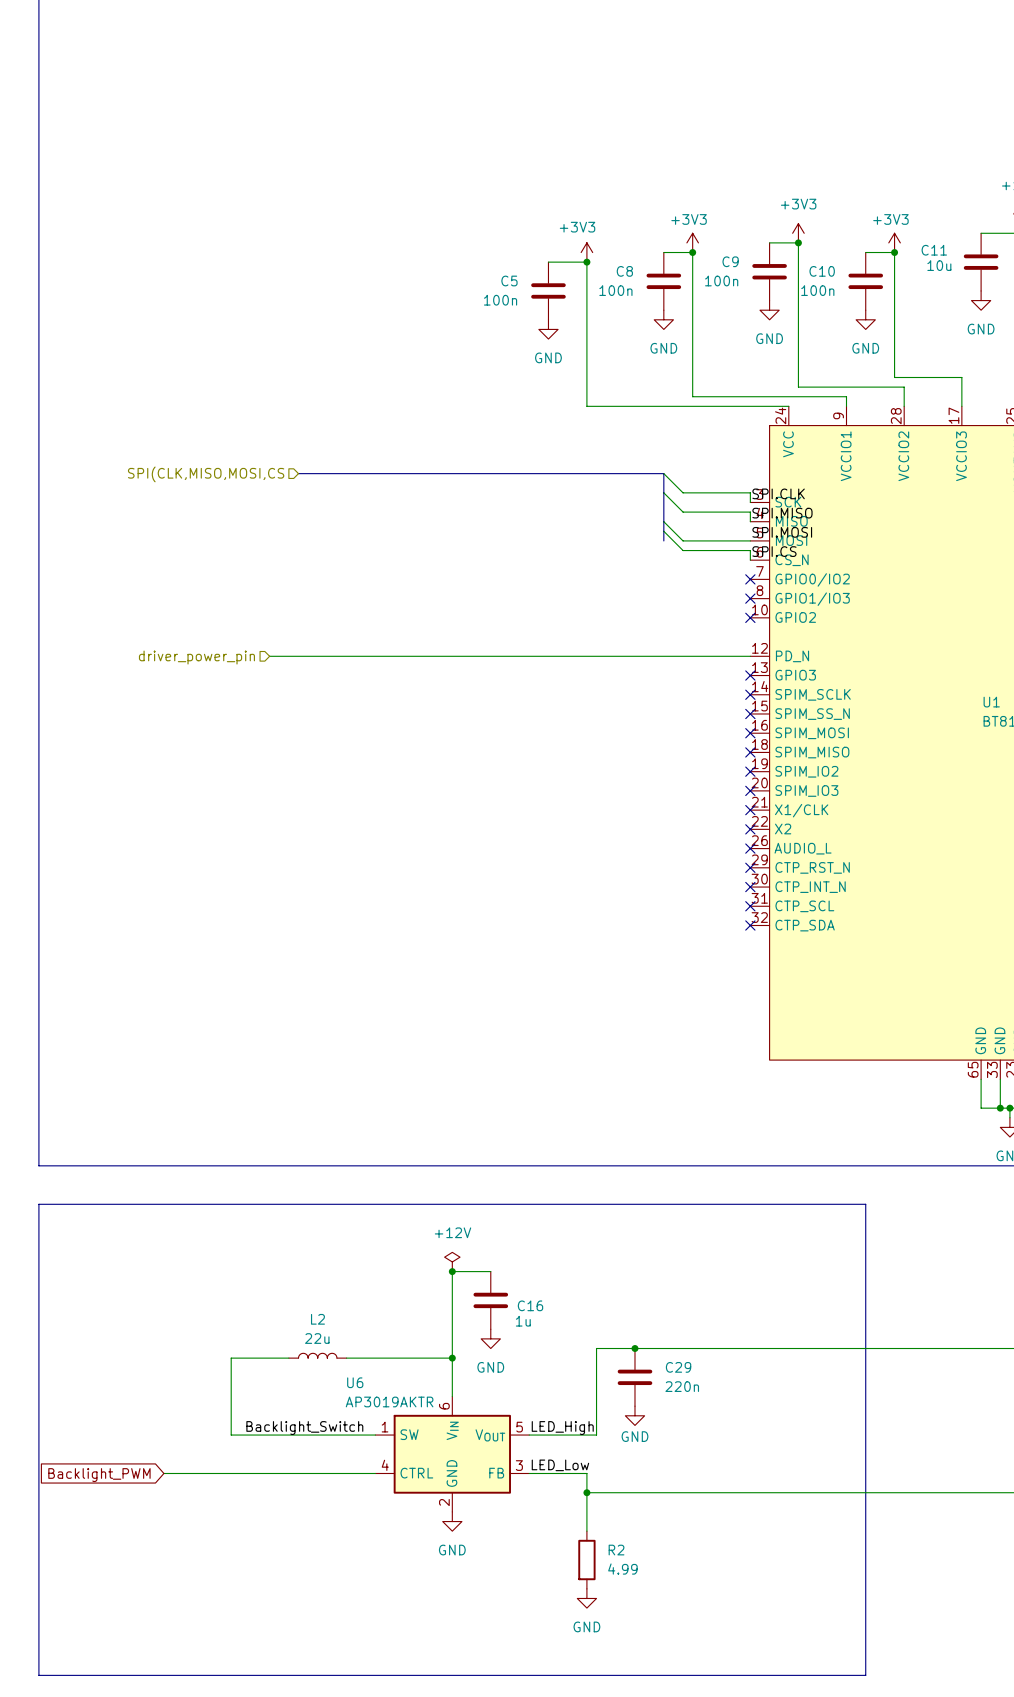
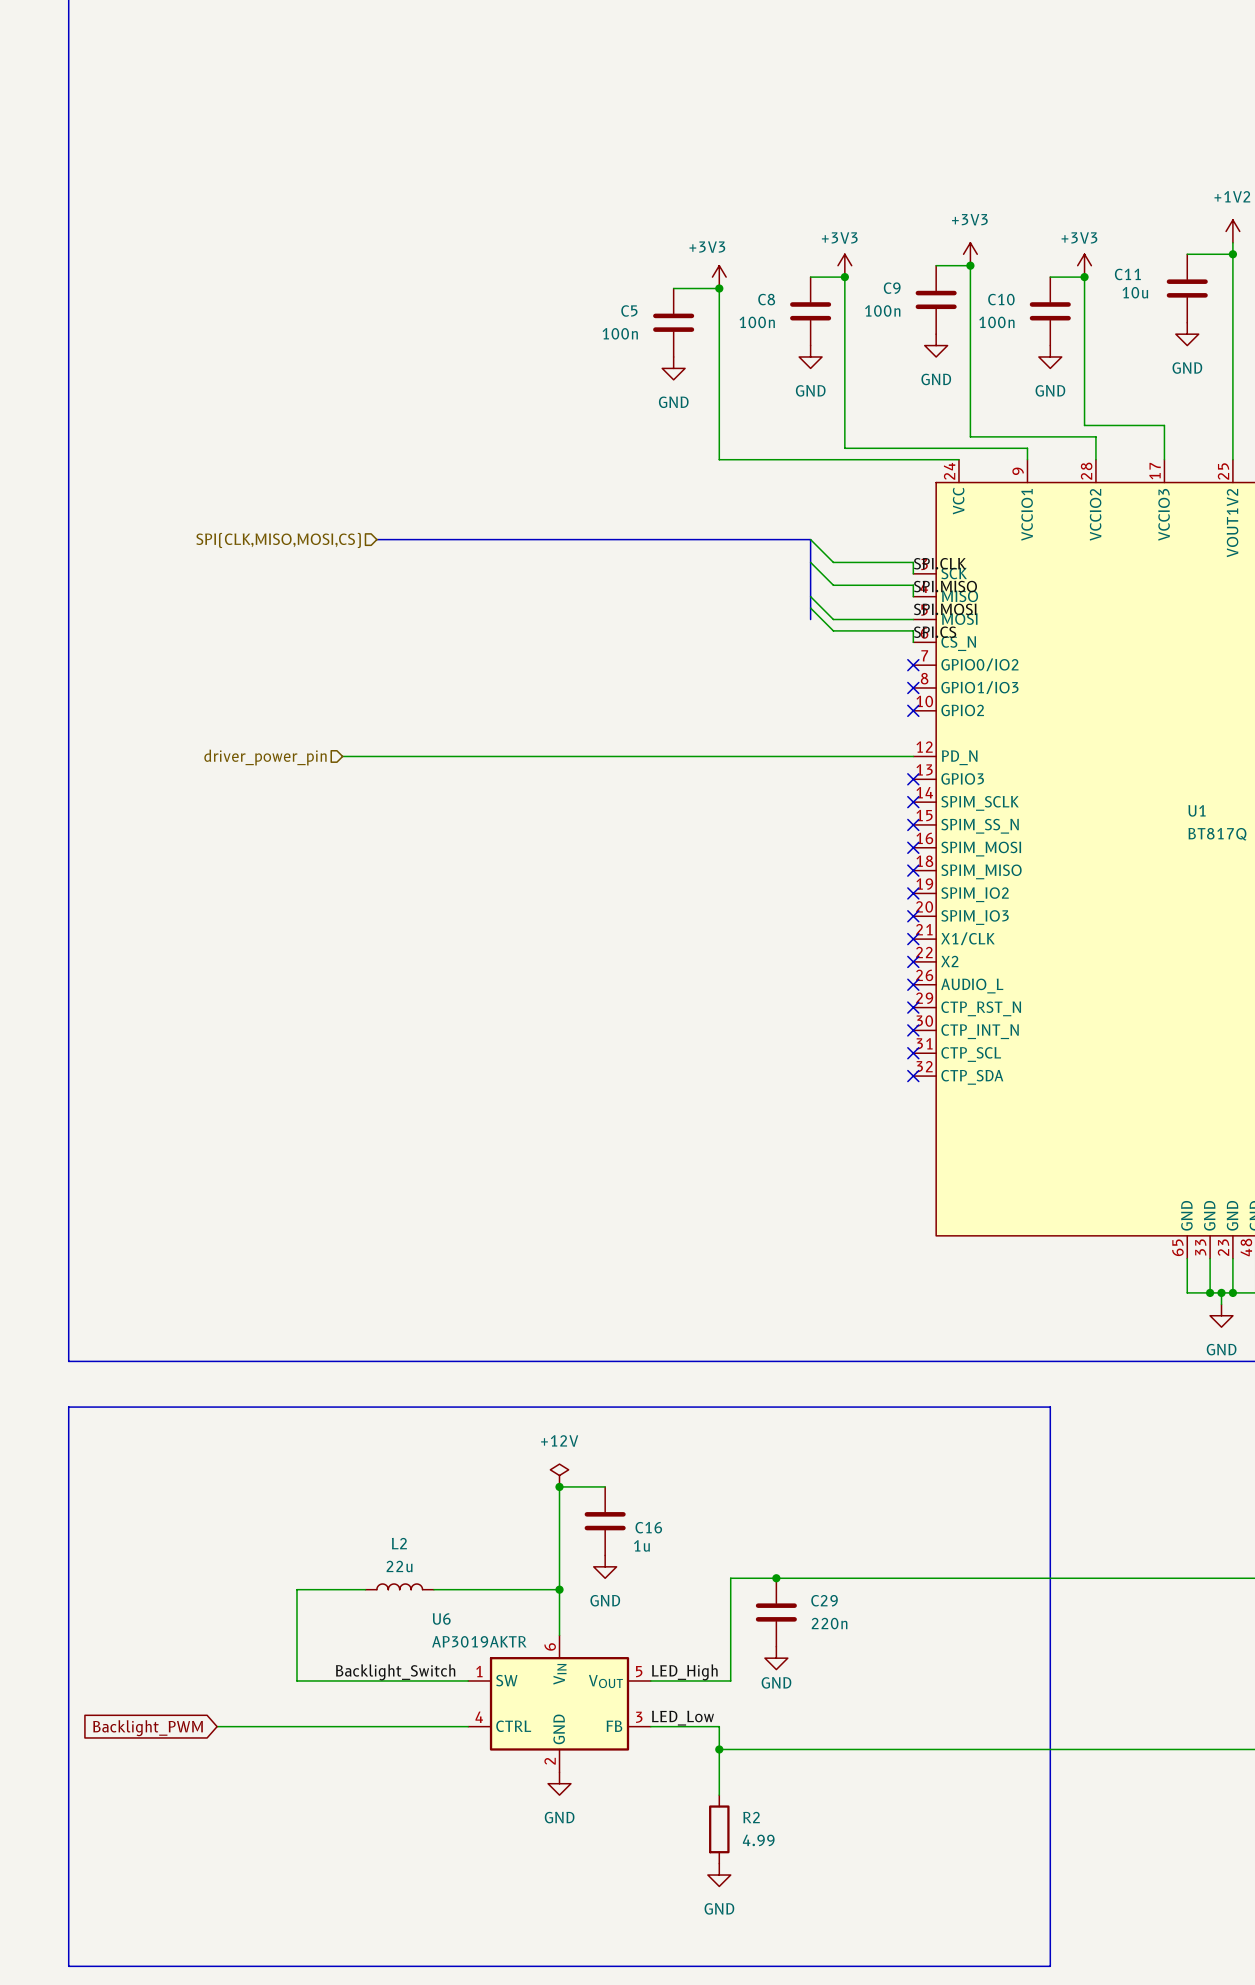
hierarchical label: SPI(CLK,MISO,MOSI,CS (206, 474) -> SPI(CLK,MISO,MOSI,CS) (278, 540)

